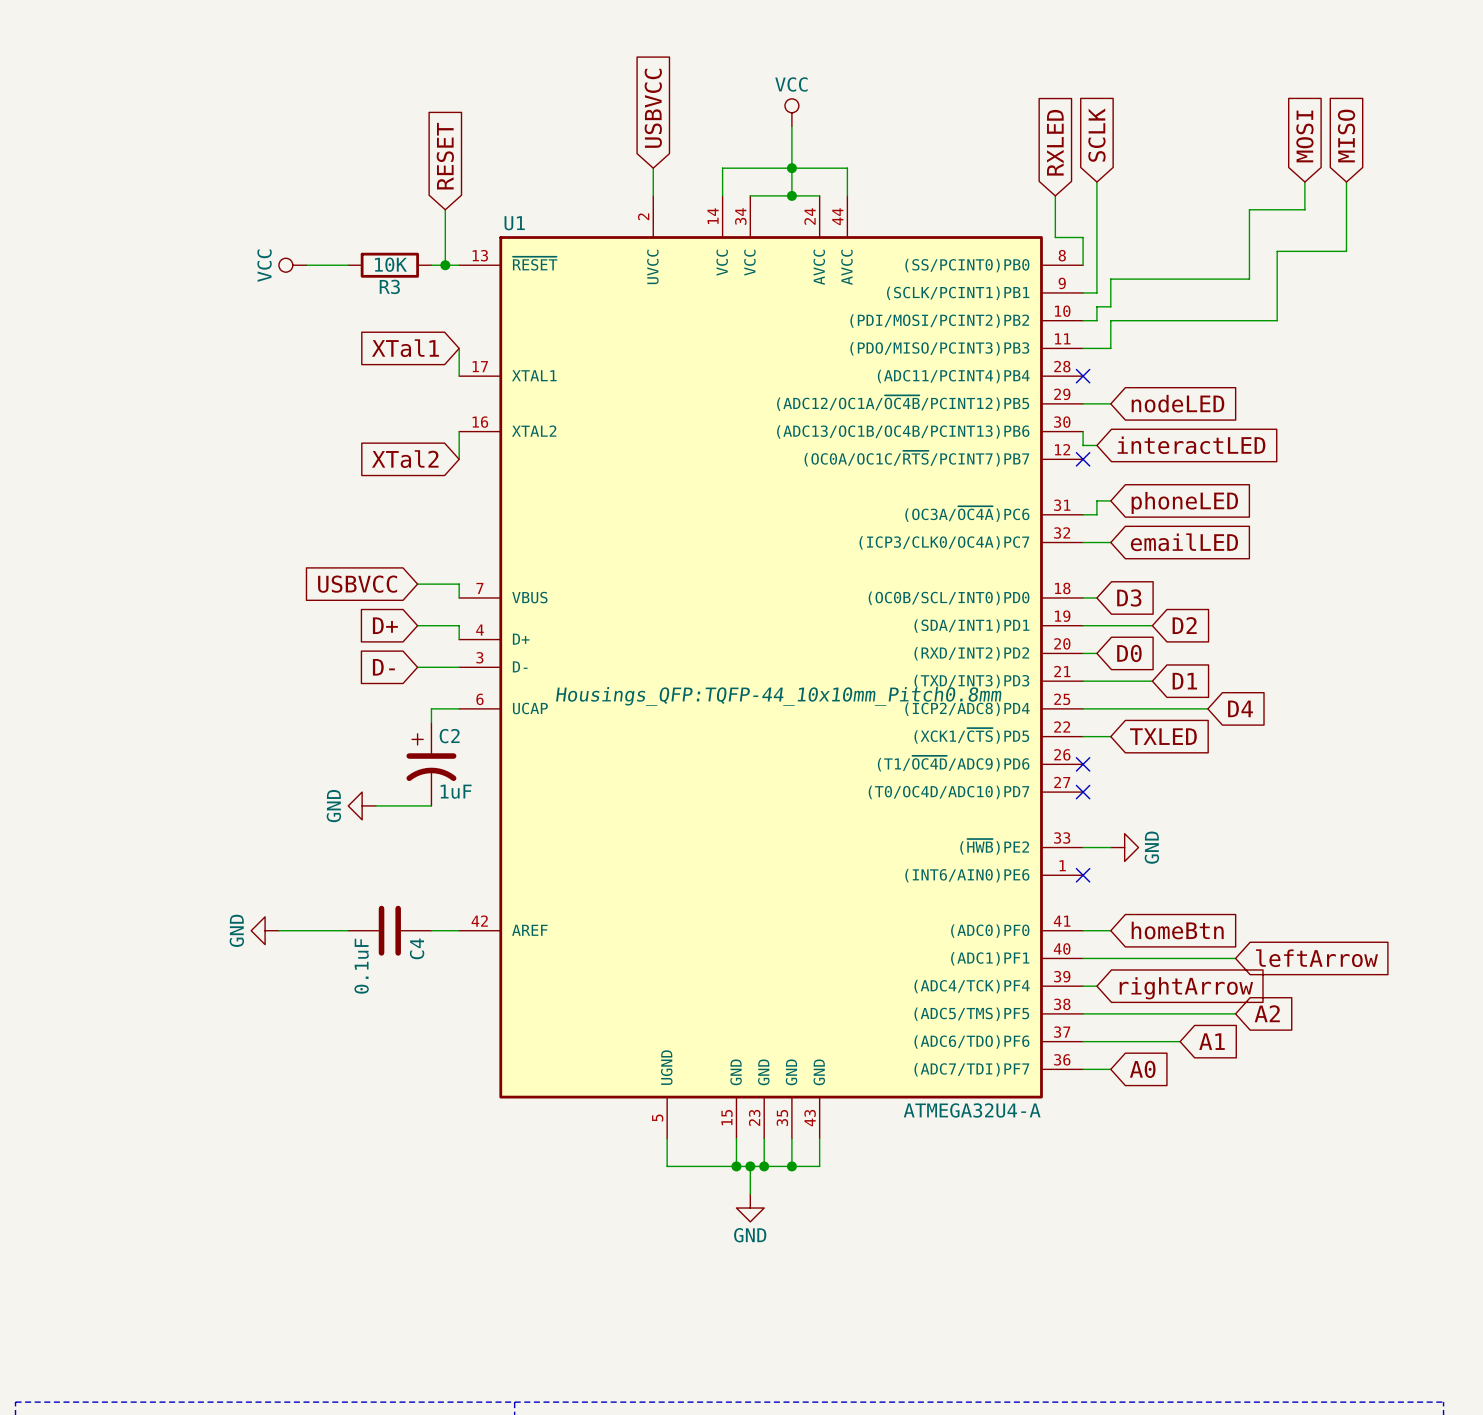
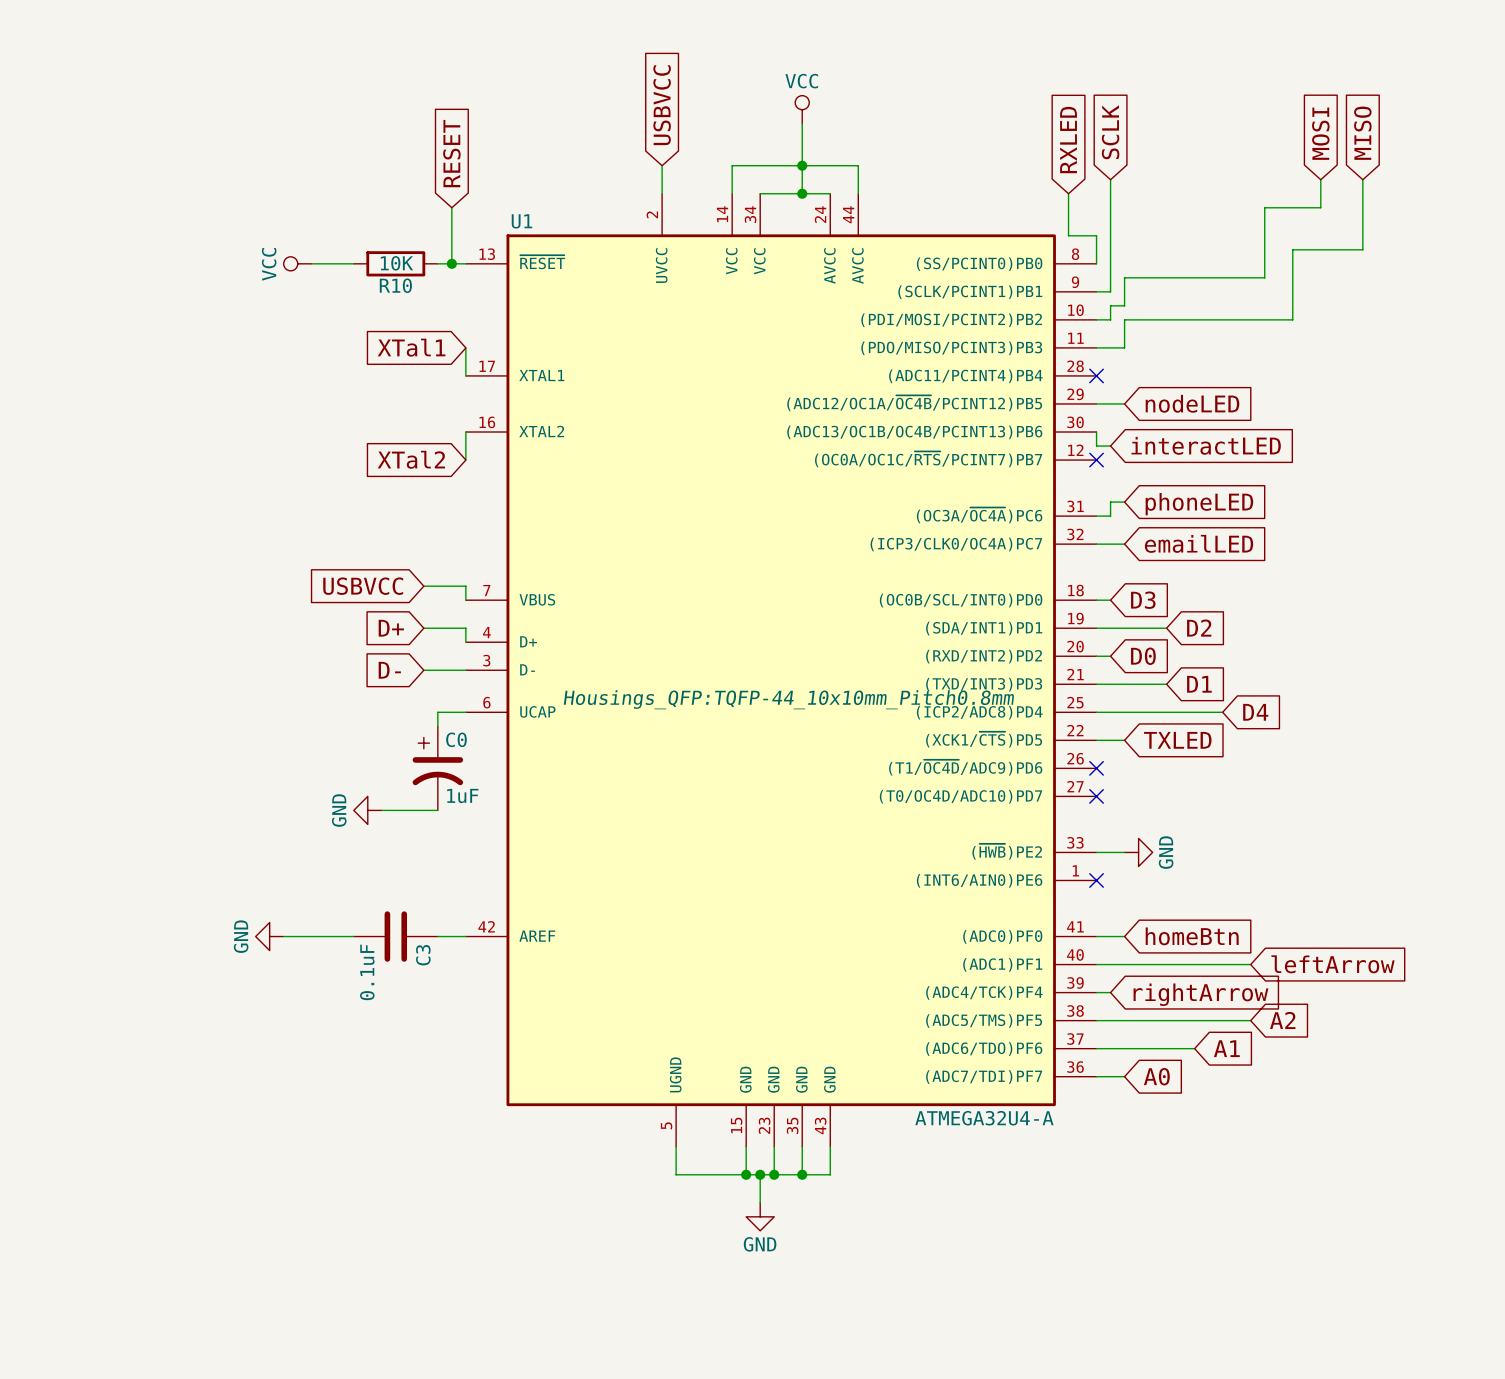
R3 name: R3 (389, 286) -> R10 (395, 285)
C2 name: C2 (449, 736) -> C0 (456, 739)
C4 name: C4 (417, 948) -> C3 (423, 955)

